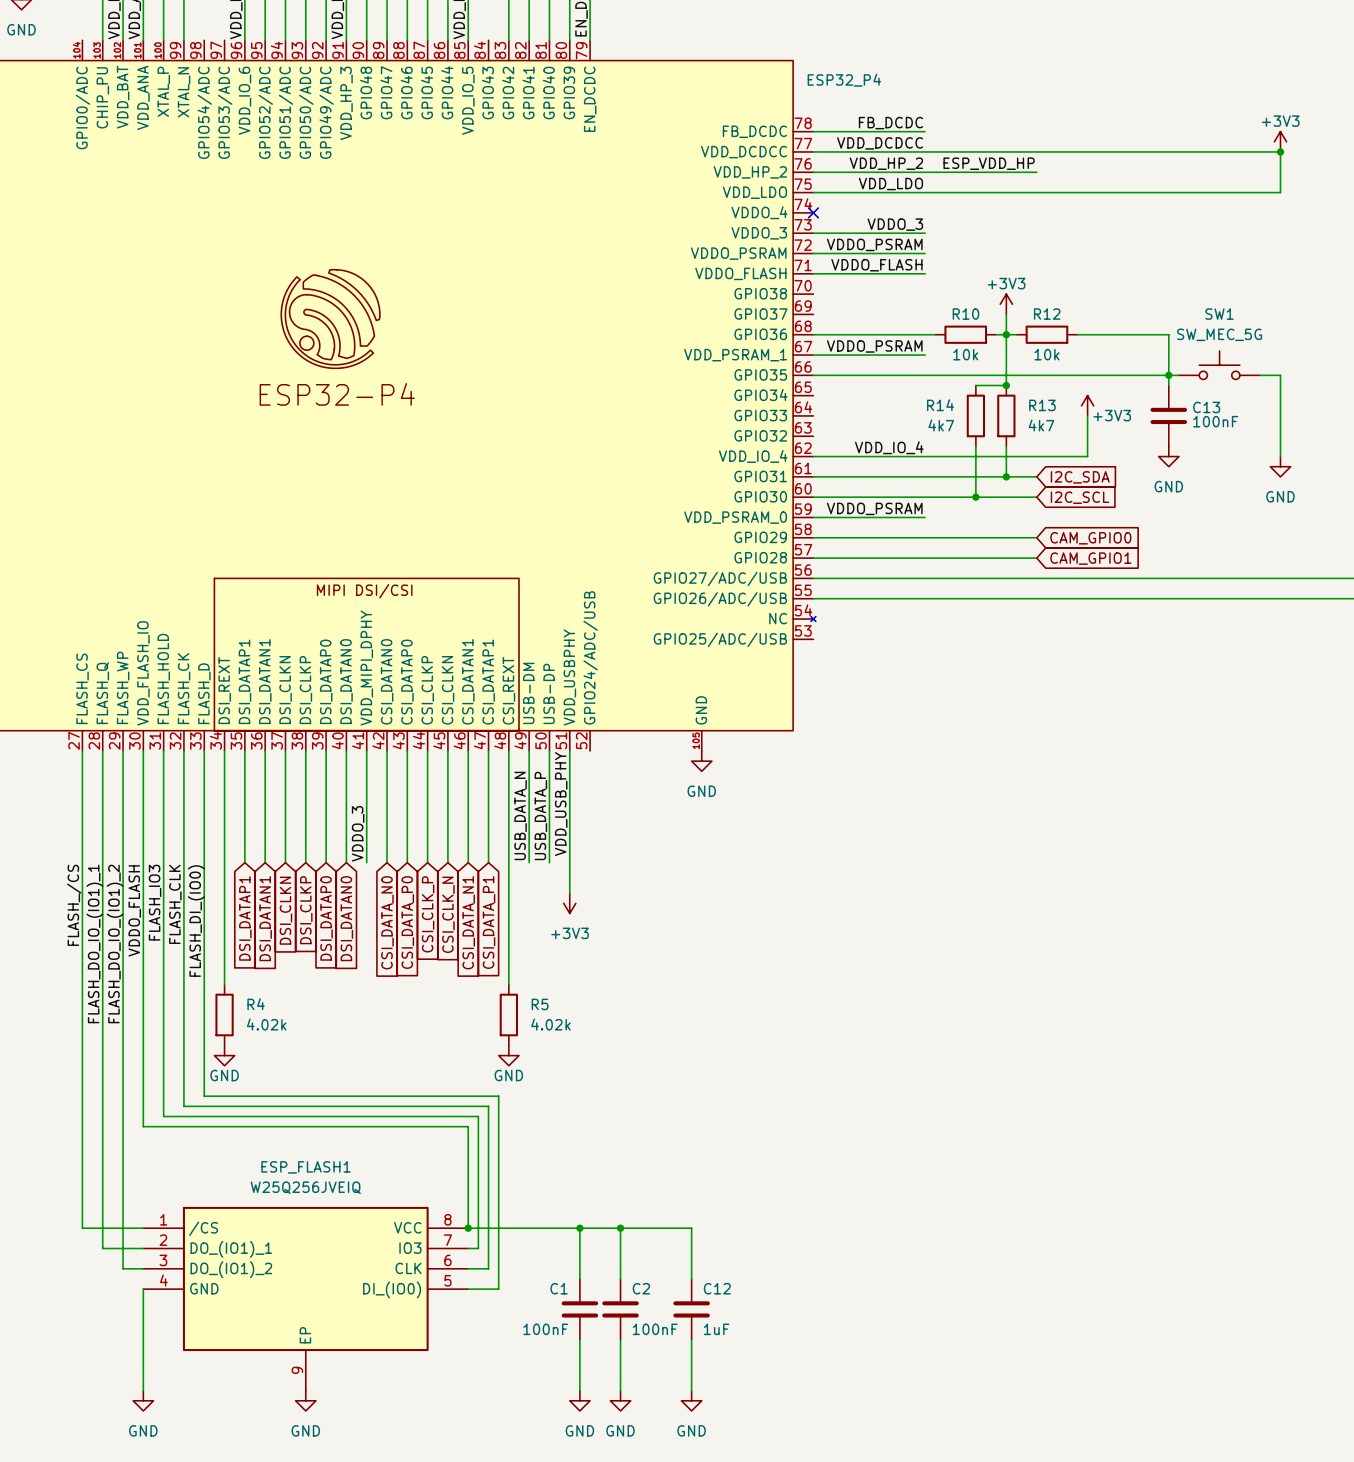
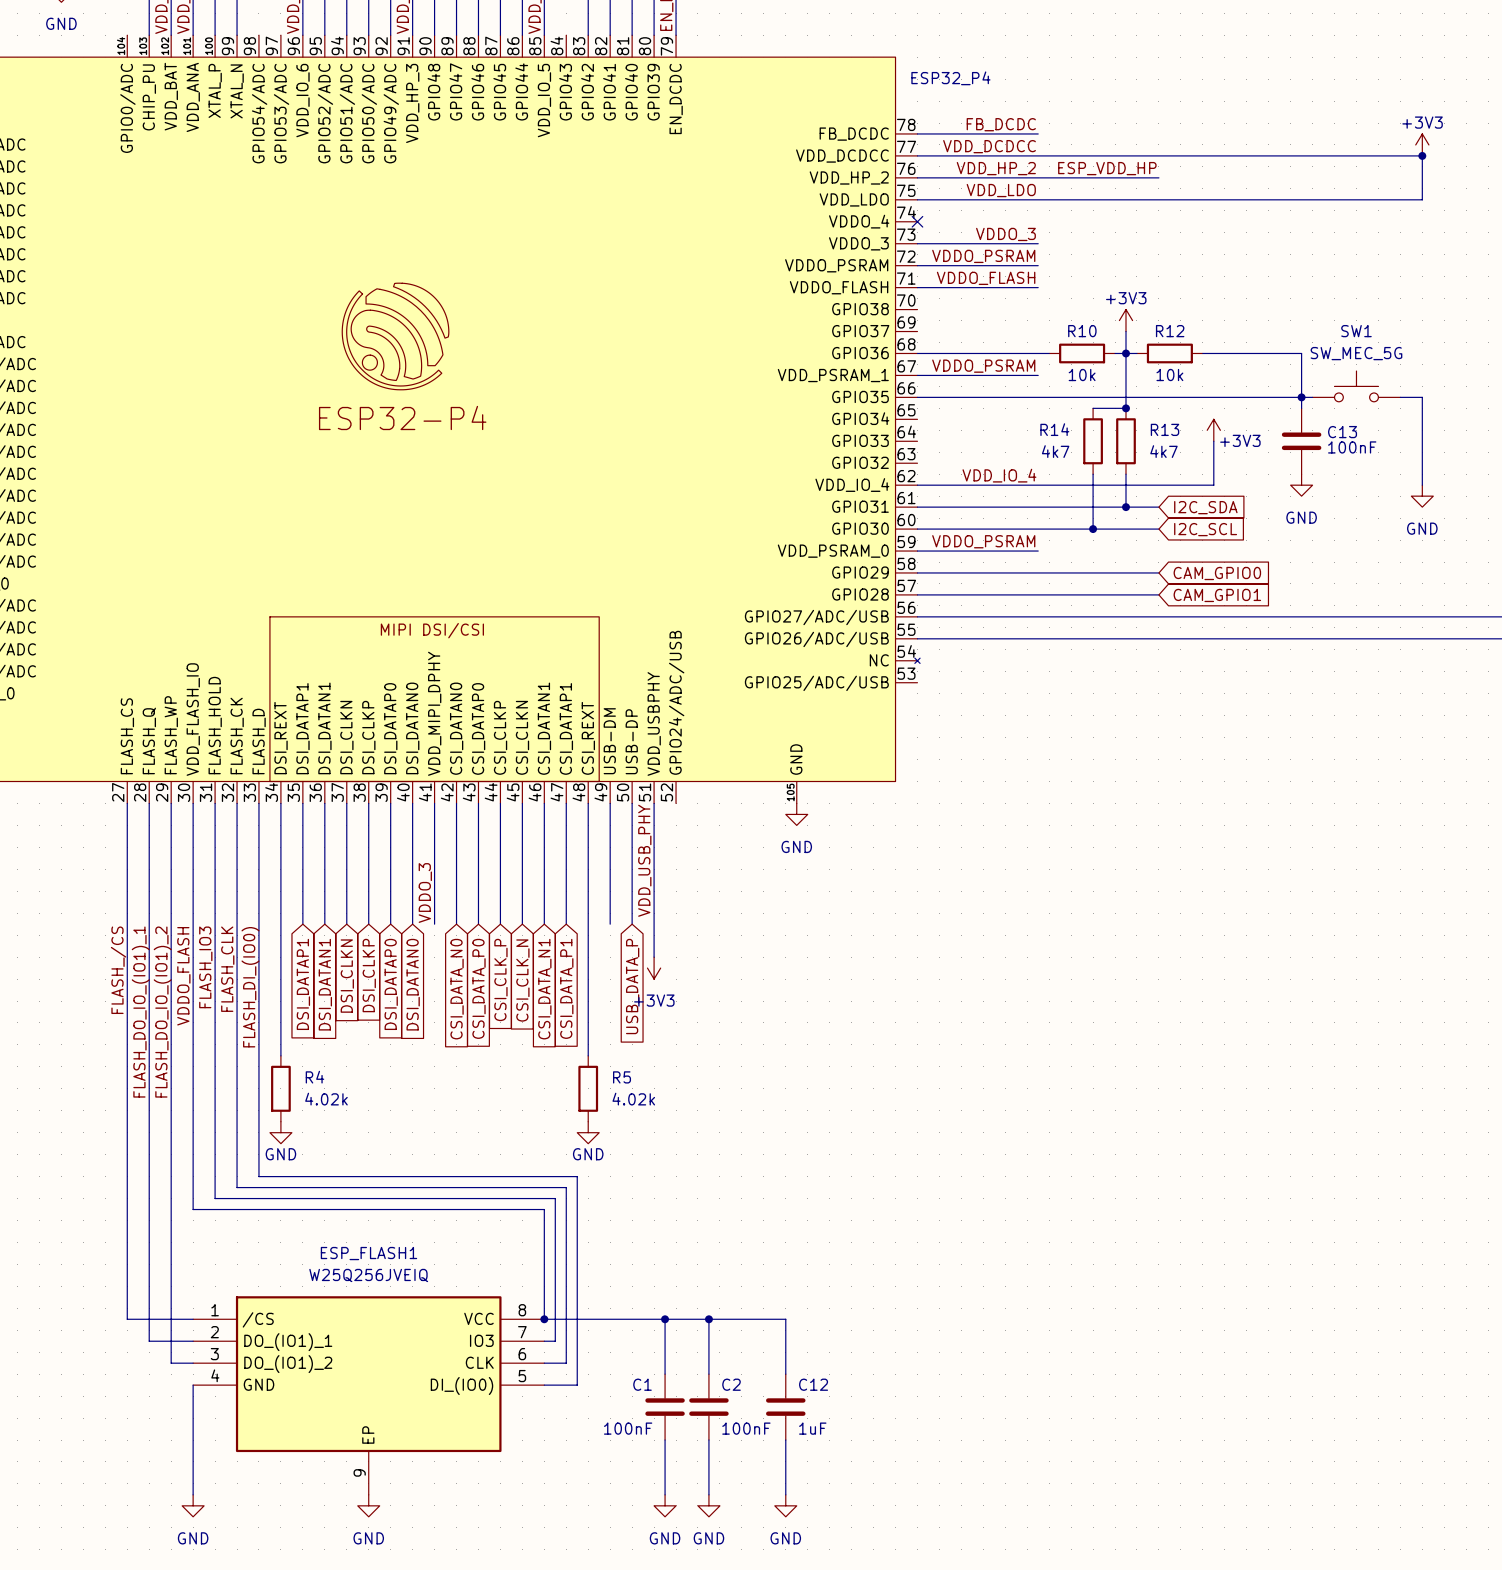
label: USB_DATA_N (520, 815) -> none
label: USB_DATA_P (540, 815) -> none
global label: none -> USB_DATA_P (632, 986)

